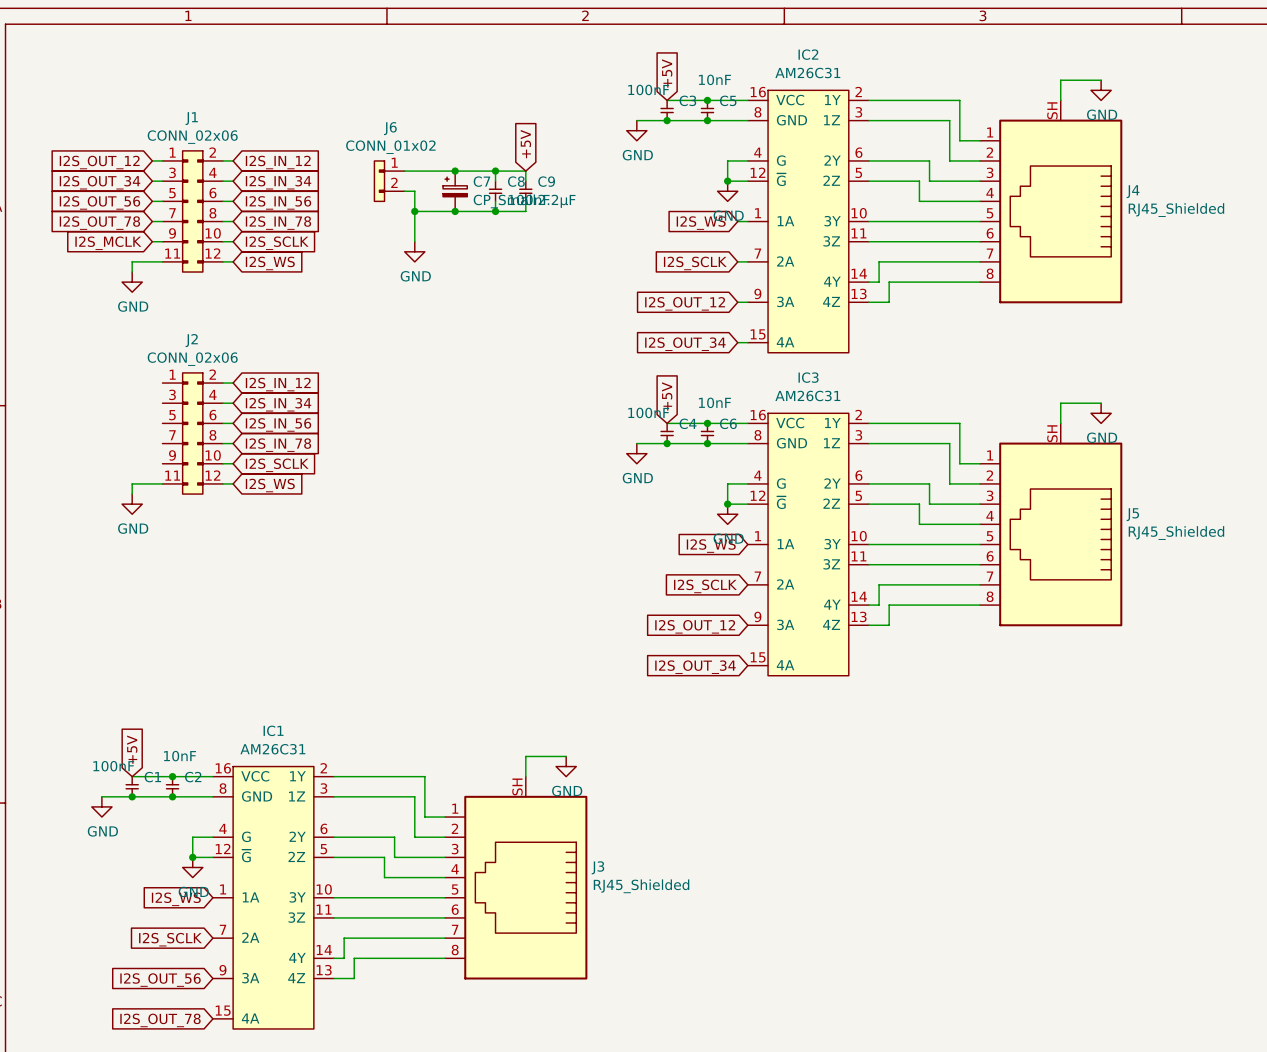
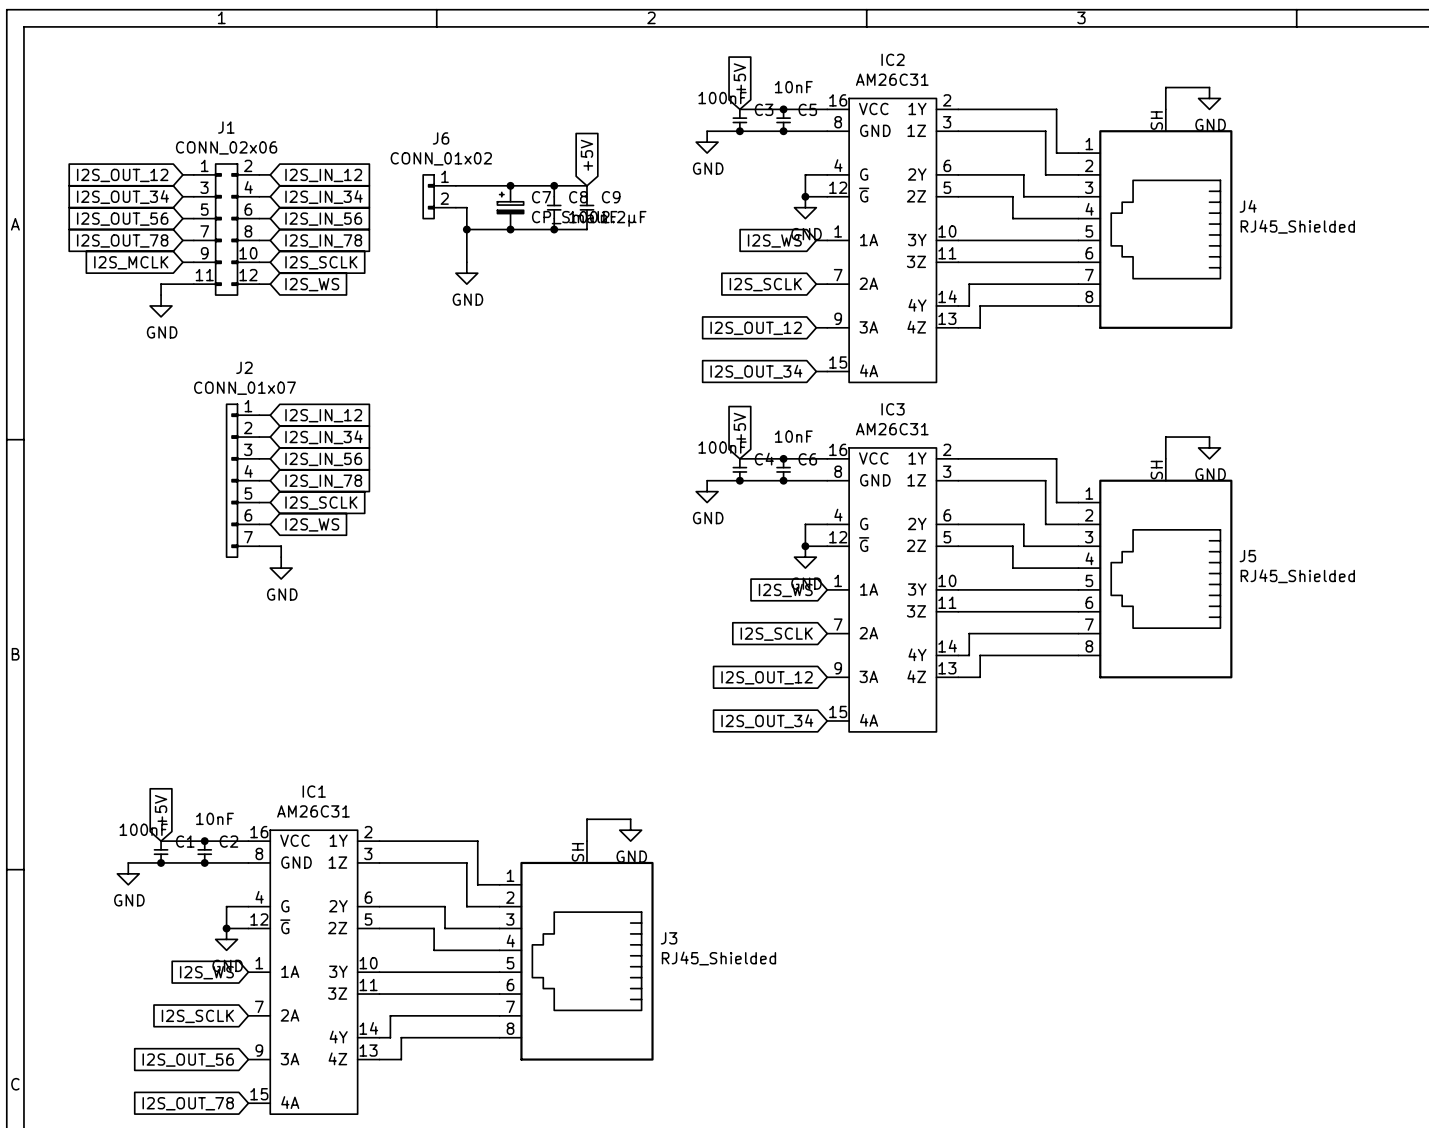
J2 value: CONN_02x06 (192, 359) -> CONN_01x07 (244, 388)
J2 symbol: [162, 372, 224, 495] -> [226, 404, 260, 558]
wire: (162, 483) (132, 483) (132, 494) -> none
power symbol position: GND (132, 504) -> GND (281, 568)
wire: none -> (259, 546) (281, 546) (281, 557)

